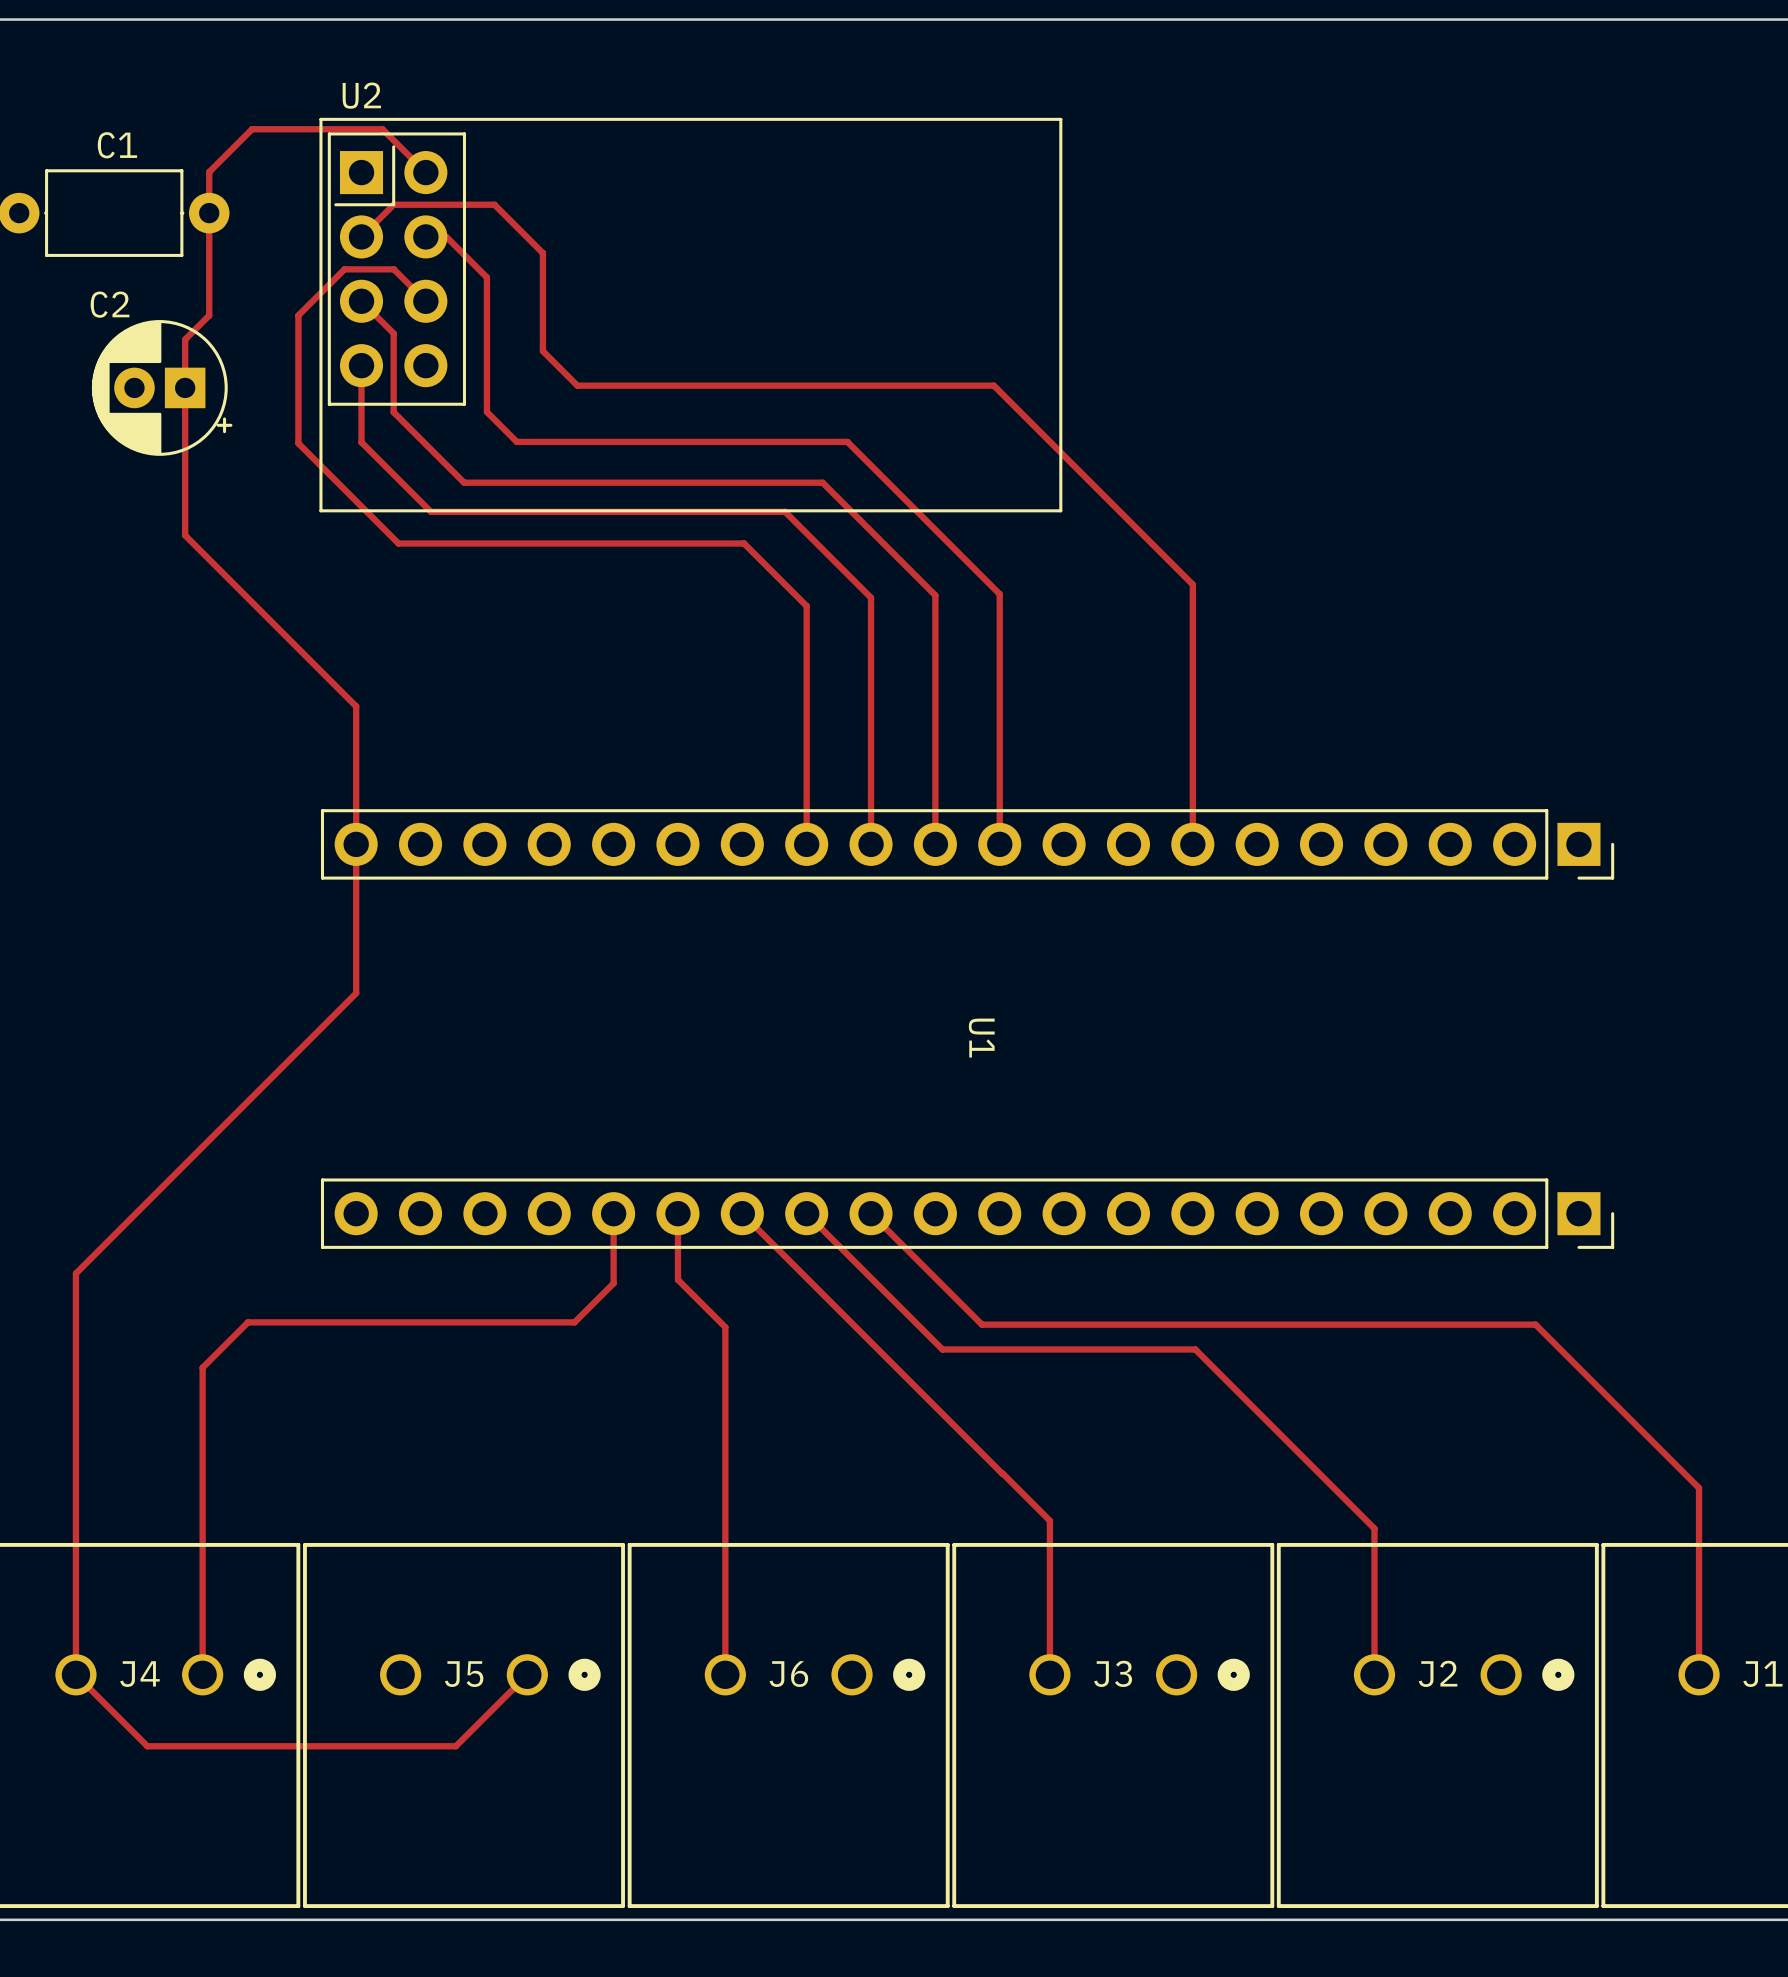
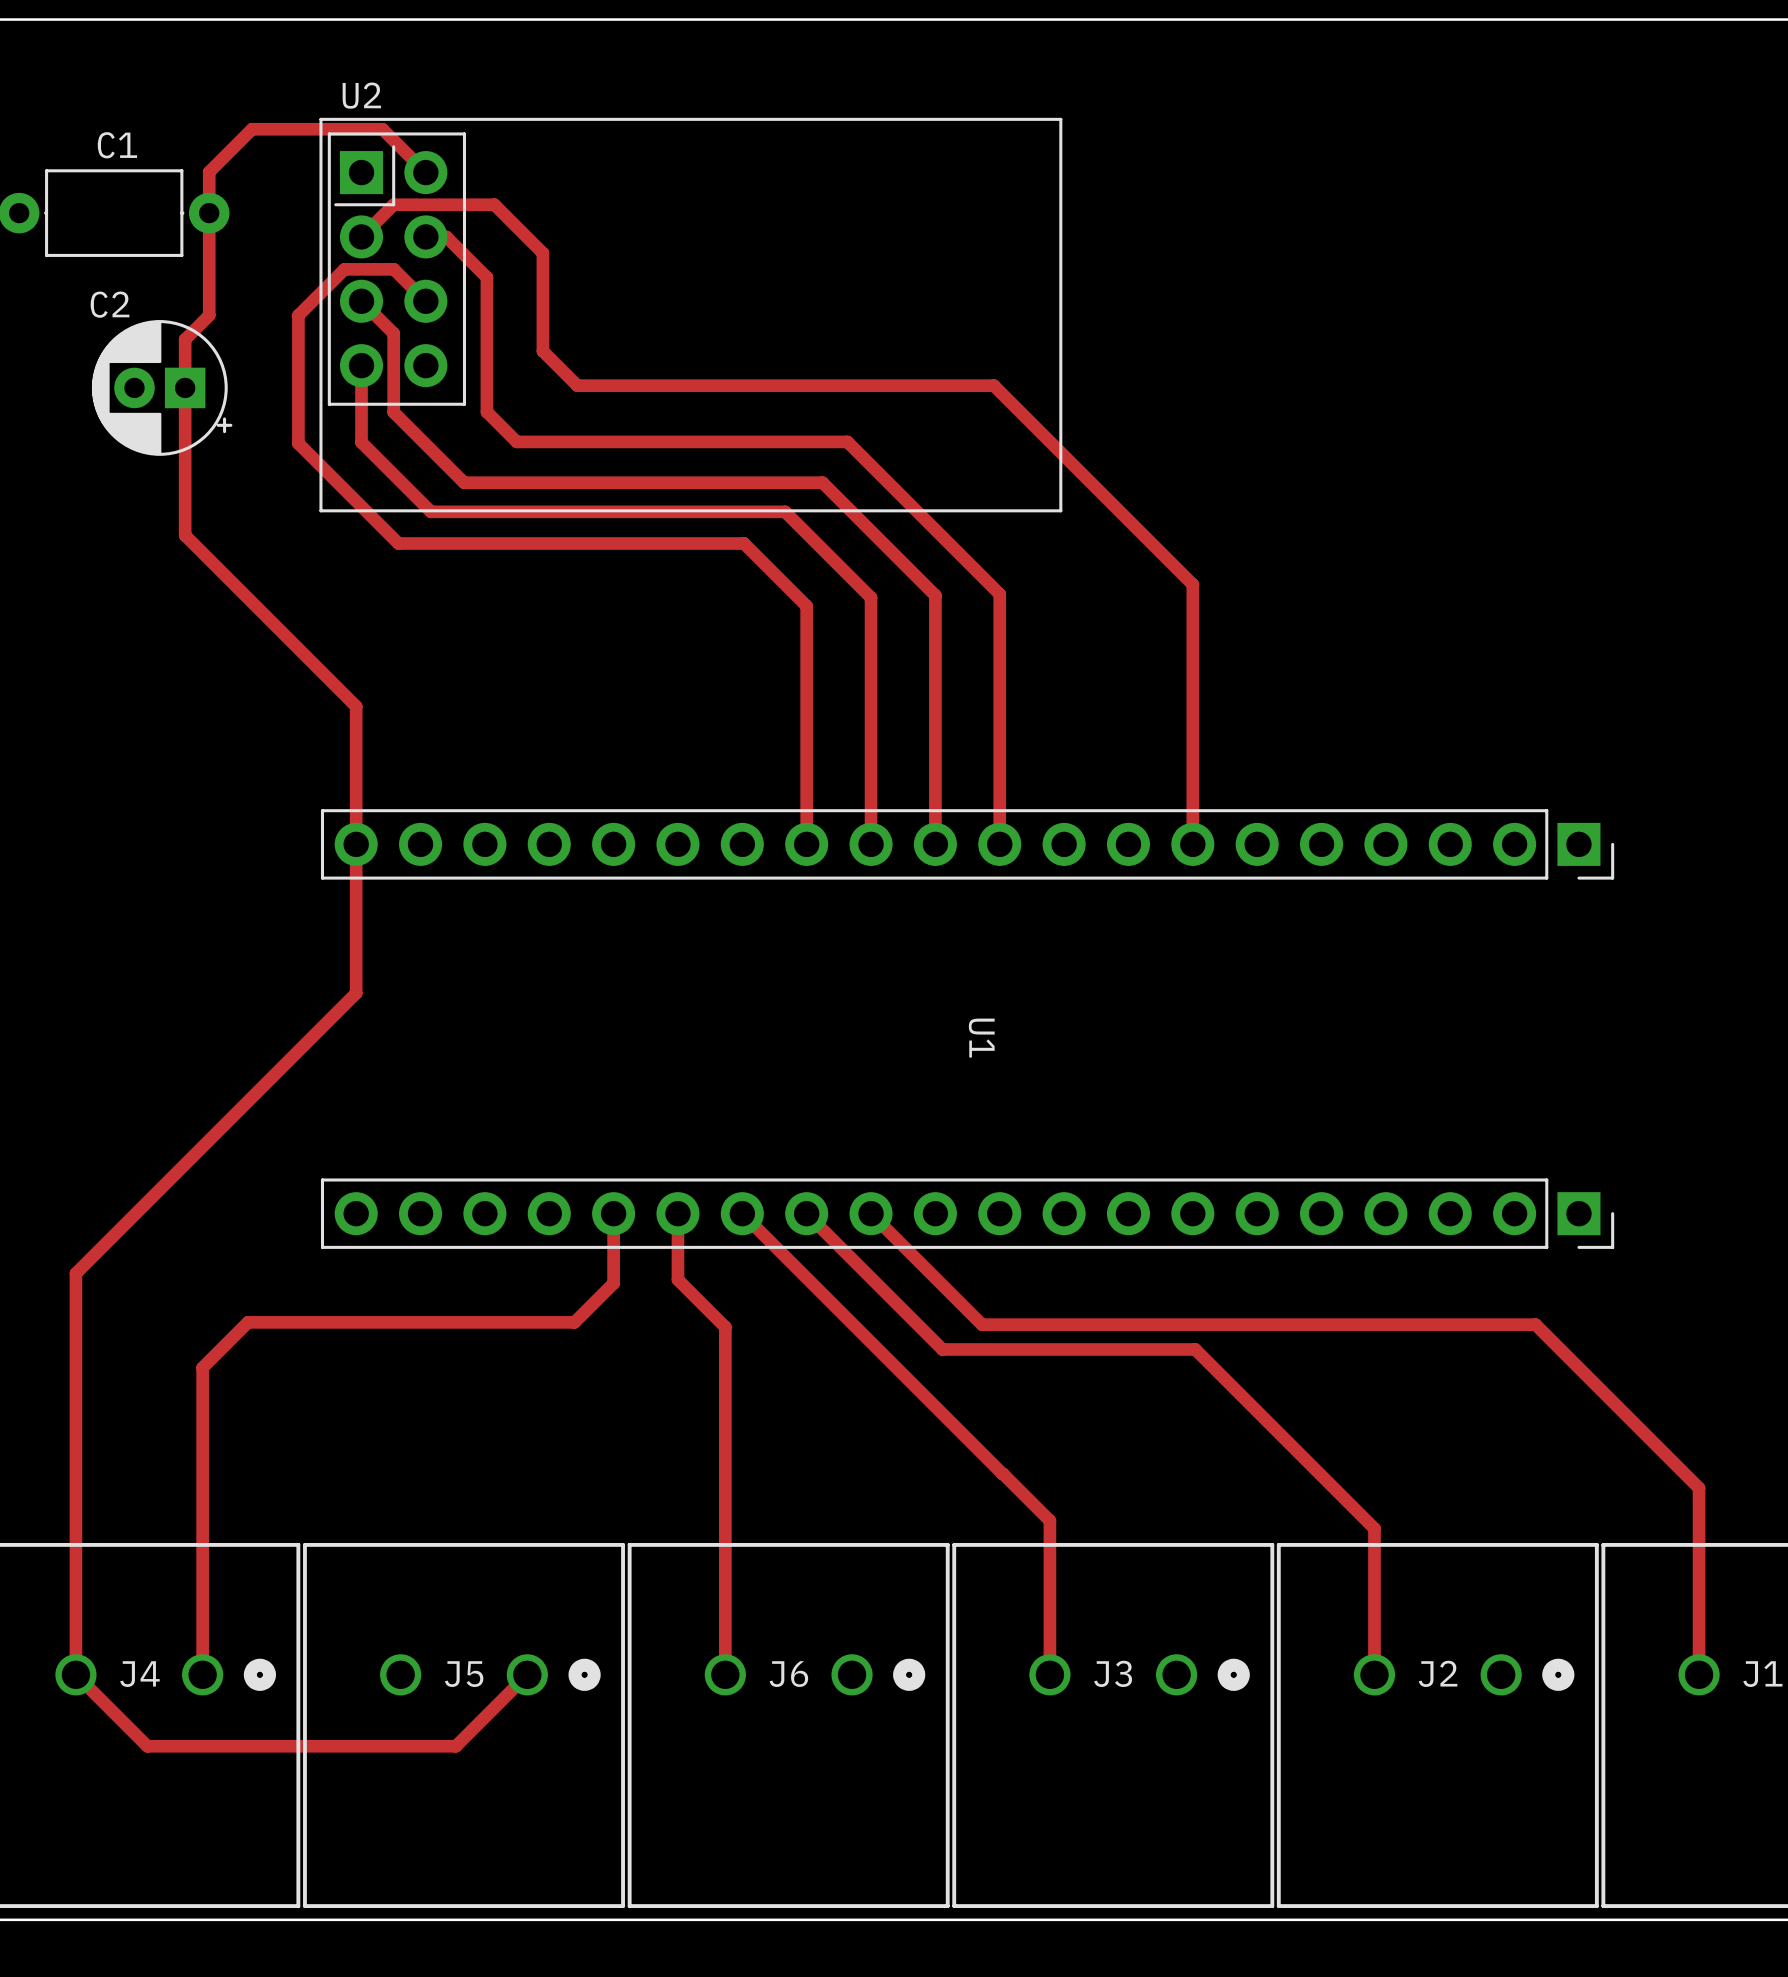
track width: thin (425, 172) (382, 129) (252, 129) (209, 172) (209, 315) (185, 339) (185, 535) (356, 706) (356, 993) (75, 1273) (75, 1674) (147, 1746) (455, 1746) (527, 1674) -> thick (425, 172) (382, 129) (252, 129) (209, 172) (209, 315) (185, 339) (185, 535) (356, 706) (356, 993) (75, 1273) (75, 1674) (147, 1746) (455, 1746) (527, 1674)
track width: thin (361, 236) (393, 204) (494, 204) (542, 253) (542, 351) (577, 385) (993, 385) (1192, 584) (1192, 844) -> thick (361, 236) (393, 204) (494, 204) (542, 253) (542, 351) (577, 385) (993, 385) (1192, 584) (1192, 844)
track width: thin (425, 236) (446, 236) (486, 277) (486, 412) (516, 441) (847, 441) (999, 594) (999, 844) -> thick (425, 236) (446, 236) (486, 277) (486, 412) (516, 441) (847, 441) (999, 594) (999, 844)
track width: thin (361, 301) (393, 333) (393, 412) (464, 482) (822, 482) (935, 595) (935, 844) -> thick (361, 301) (393, 333) (393, 412) (464, 482) (822, 482) (935, 595) (935, 844)
track width: thin (425, 301) (393, 269) (344, 269) (298, 315) (298, 443) (398, 543) (744, 543) (806, 606) (806, 844) -> thick (425, 301) (393, 269) (344, 269) (298, 315) (298, 443) (398, 543) (744, 543) (806, 606) (806, 844)
track width: thin (361, 365) (361, 442) (430, 511) (785, 511) (871, 597) (871, 844) -> thick (361, 365) (361, 442) (430, 511) (785, 511) (871, 597) (871, 844)
track width: thin (613, 1213) (613, 1283) (574, 1322) (248, 1322) (202, 1367) (202, 1674) -> thick (613, 1213) (613, 1283) (574, 1322) (248, 1322) (202, 1367) (202, 1674)
track width: thin (677, 1213) (677, 1279) (725, 1327) (725, 1674) -> thick (677, 1213) (677, 1279) (725, 1327) (725, 1674)
track width: thin (742, 1213) (1002, 1473) -> thick (742, 1213) (1002, 1473)
track width: thin (806, 1213) (942, 1349) (1195, 1349) (1374, 1528) (1374, 1674) -> thick (806, 1213) (942, 1349) (1195, 1349) (1374, 1528) (1374, 1674)
track width: thin (871, 1213) (982, 1324) (1535, 1324) (1699, 1488) (1699, 1674) -> thick (871, 1213) (982, 1324) (1535, 1324) (1699, 1488) (1699, 1674)
track width: thin (1003, 1473) (1049, 1520) (1049, 1674) -> thick (1003, 1473) (1049, 1520) (1049, 1674)

